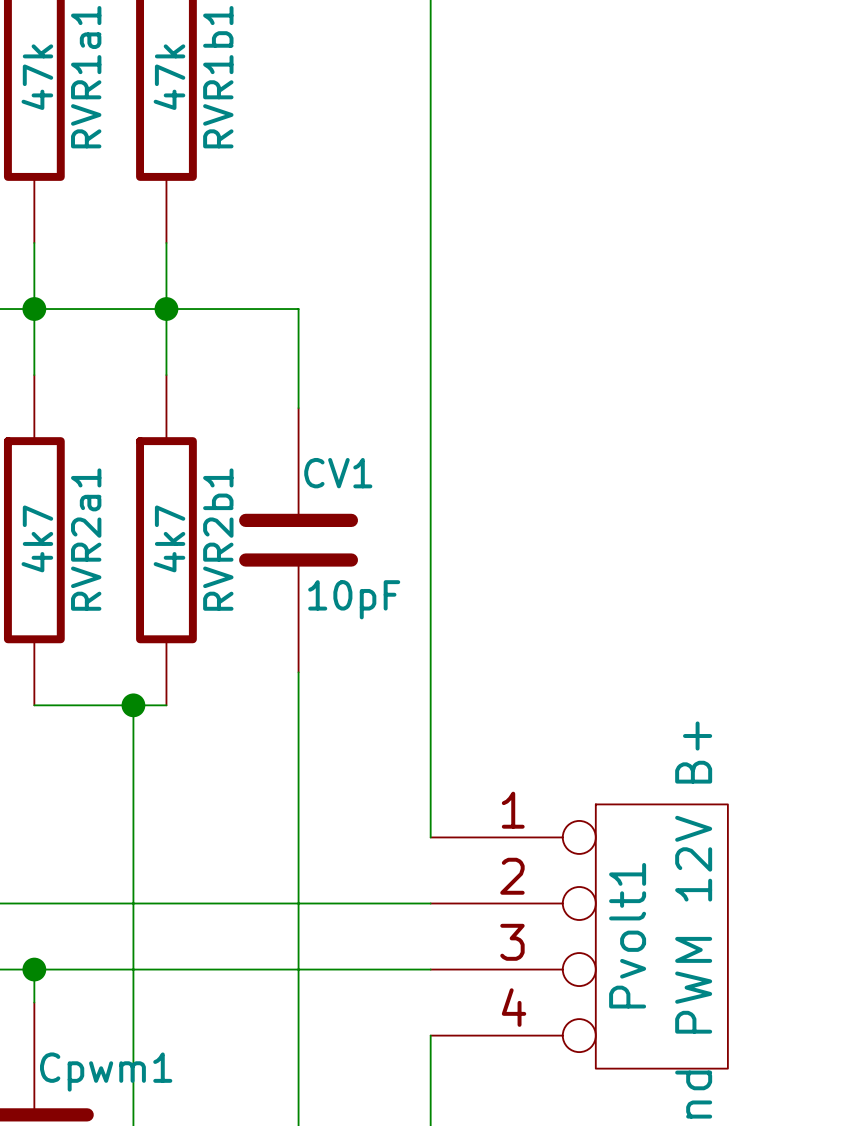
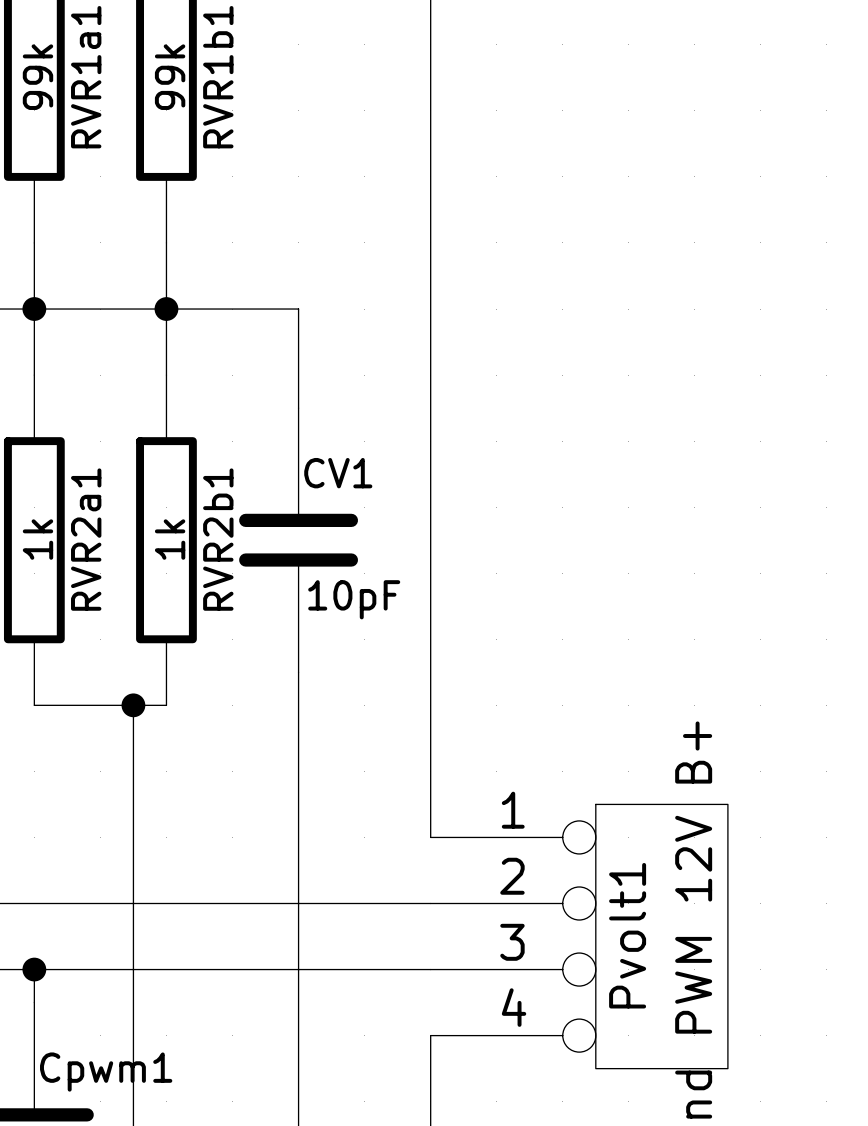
RVR1a1 value: 47k (37, 77) -> 99k (37, 77)
RVR1b1 value: 47k (169, 77) -> 99k (170, 77)
RVR2a1 value: 4k7 (37, 538) -> 1k (37, 539)
RVR2b1 value: 4k7 (169, 538) -> 1k (170, 539)

